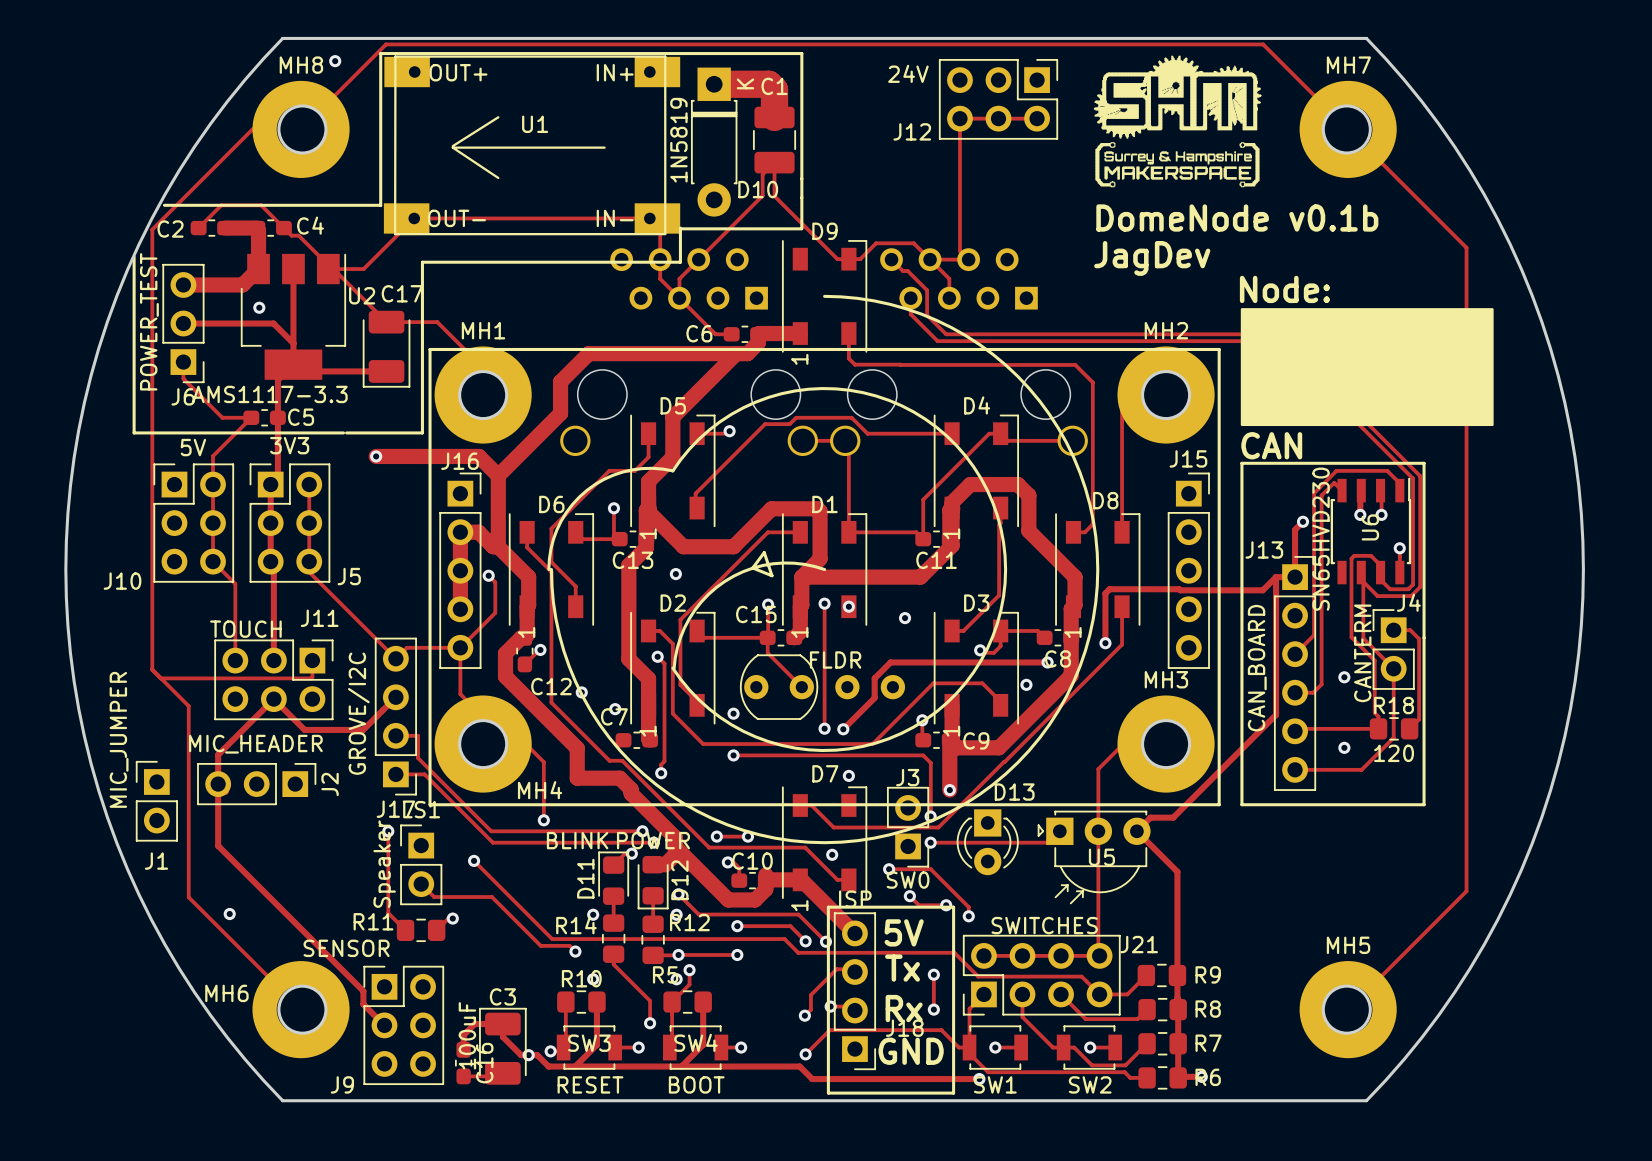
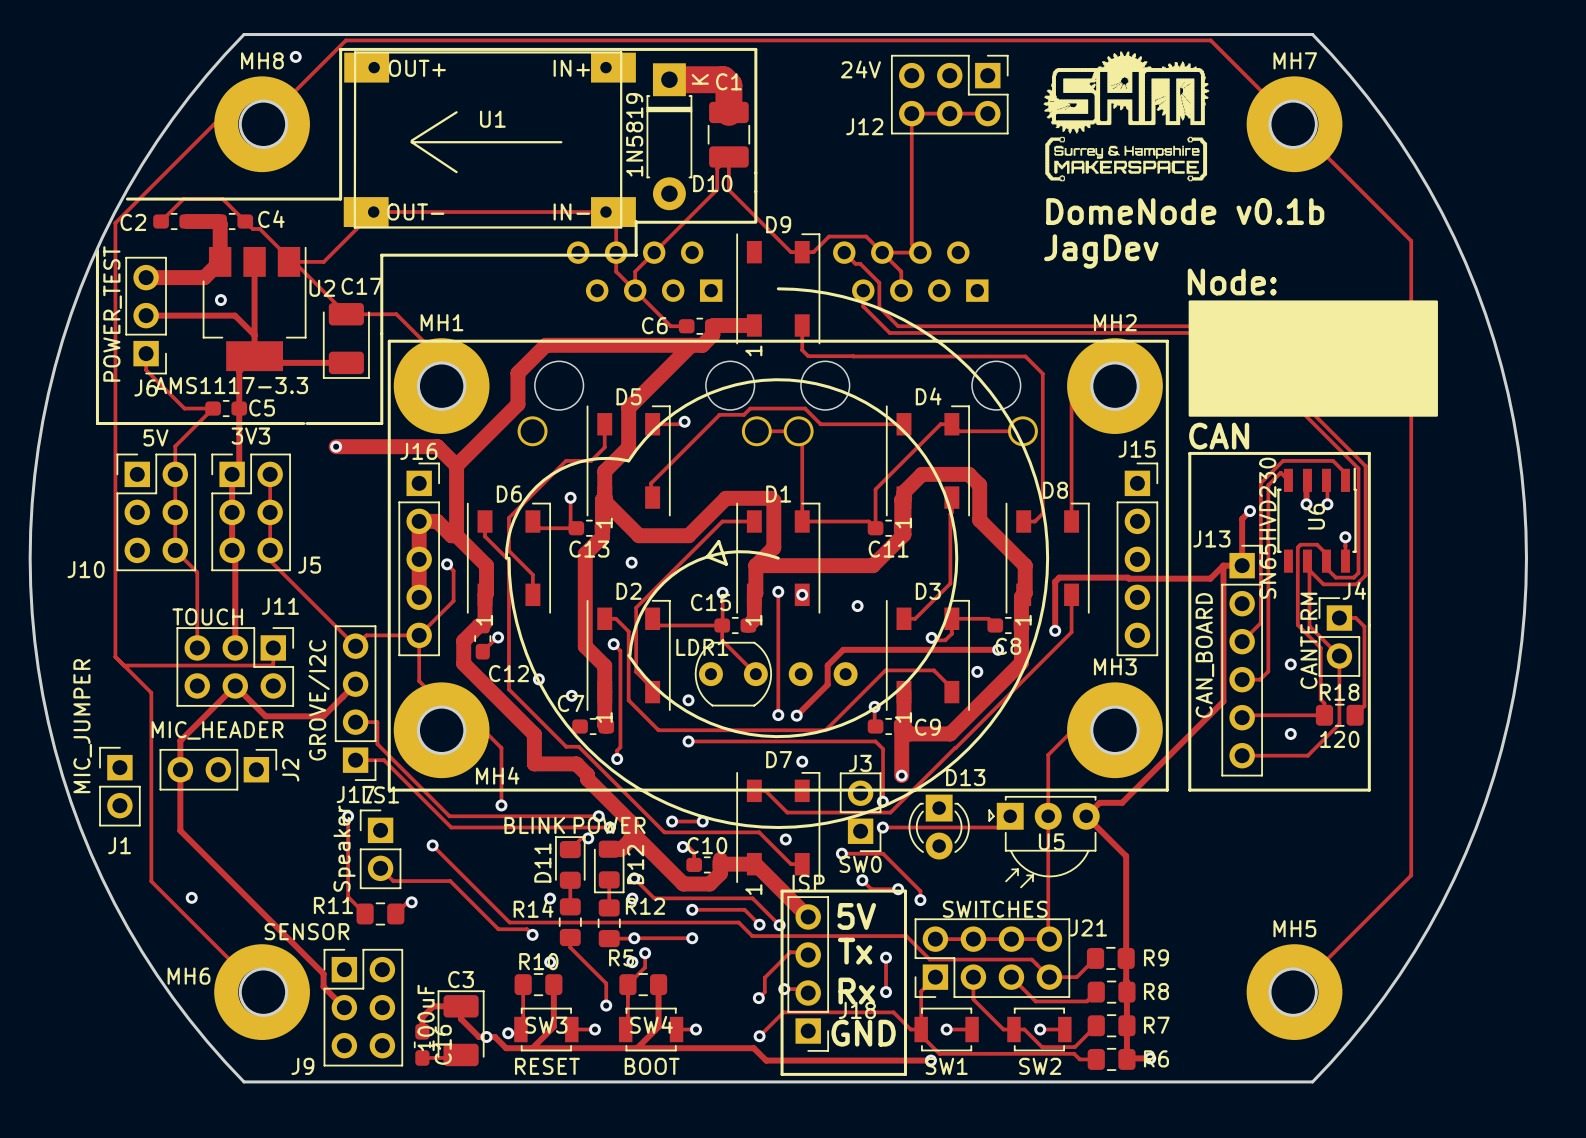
LDR1 name: none -> LDR1 (702, 647)
LDR1 value: FLDR (835, 660) -> none

